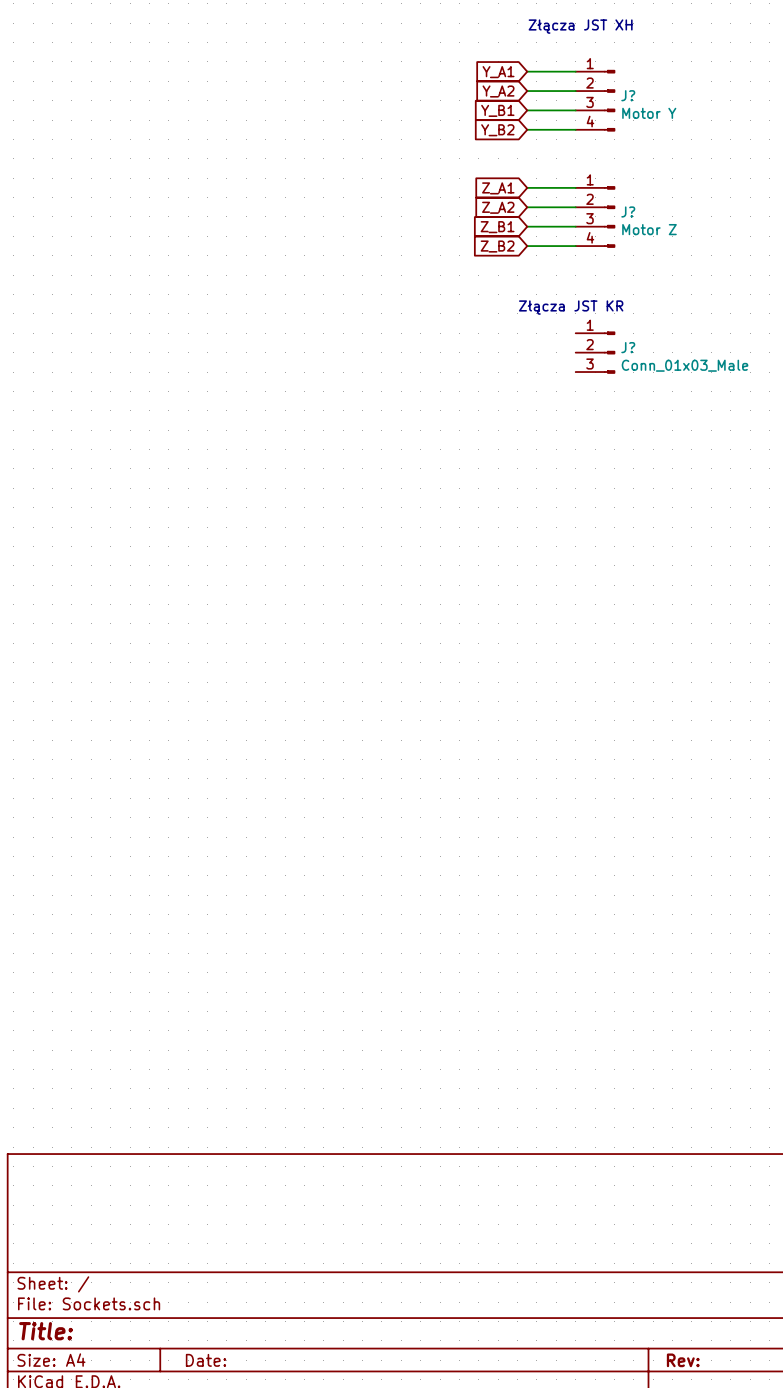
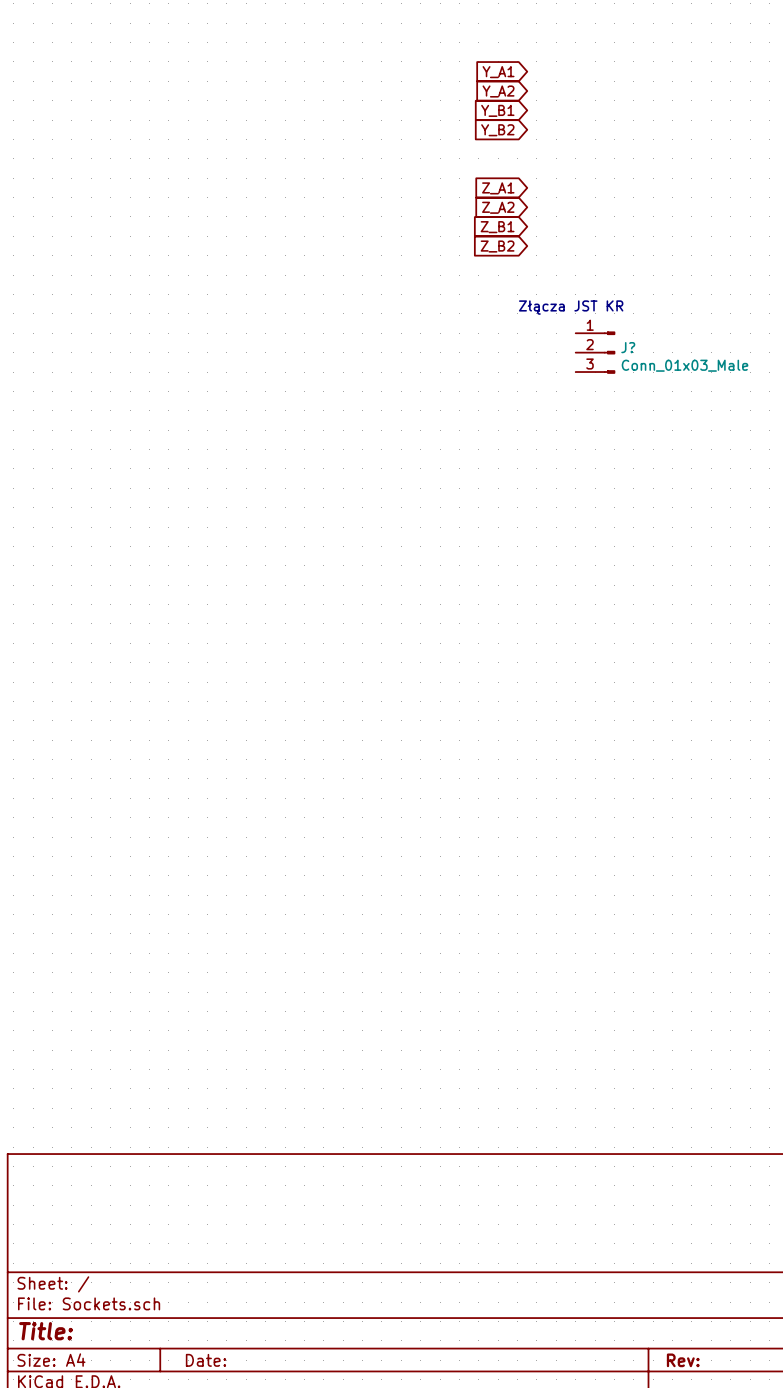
text: Złącza JST XH (580, 26) -> none
wire: (527, 71) (575, 71) -> none
wire: (527, 91) (575, 91) -> none
J?: Motor Y (595, 100) -> none
wire: (527, 110) (575, 110) -> none
wire: (527, 129) (575, 129) -> none
wire: (527, 187) (575, 187) -> none
wire: (527, 207) (575, 207) -> none
J?: Motor Z (595, 216) -> none
wire: (527, 226) (575, 226) -> none
wire: (527, 246) (575, 246) -> none

